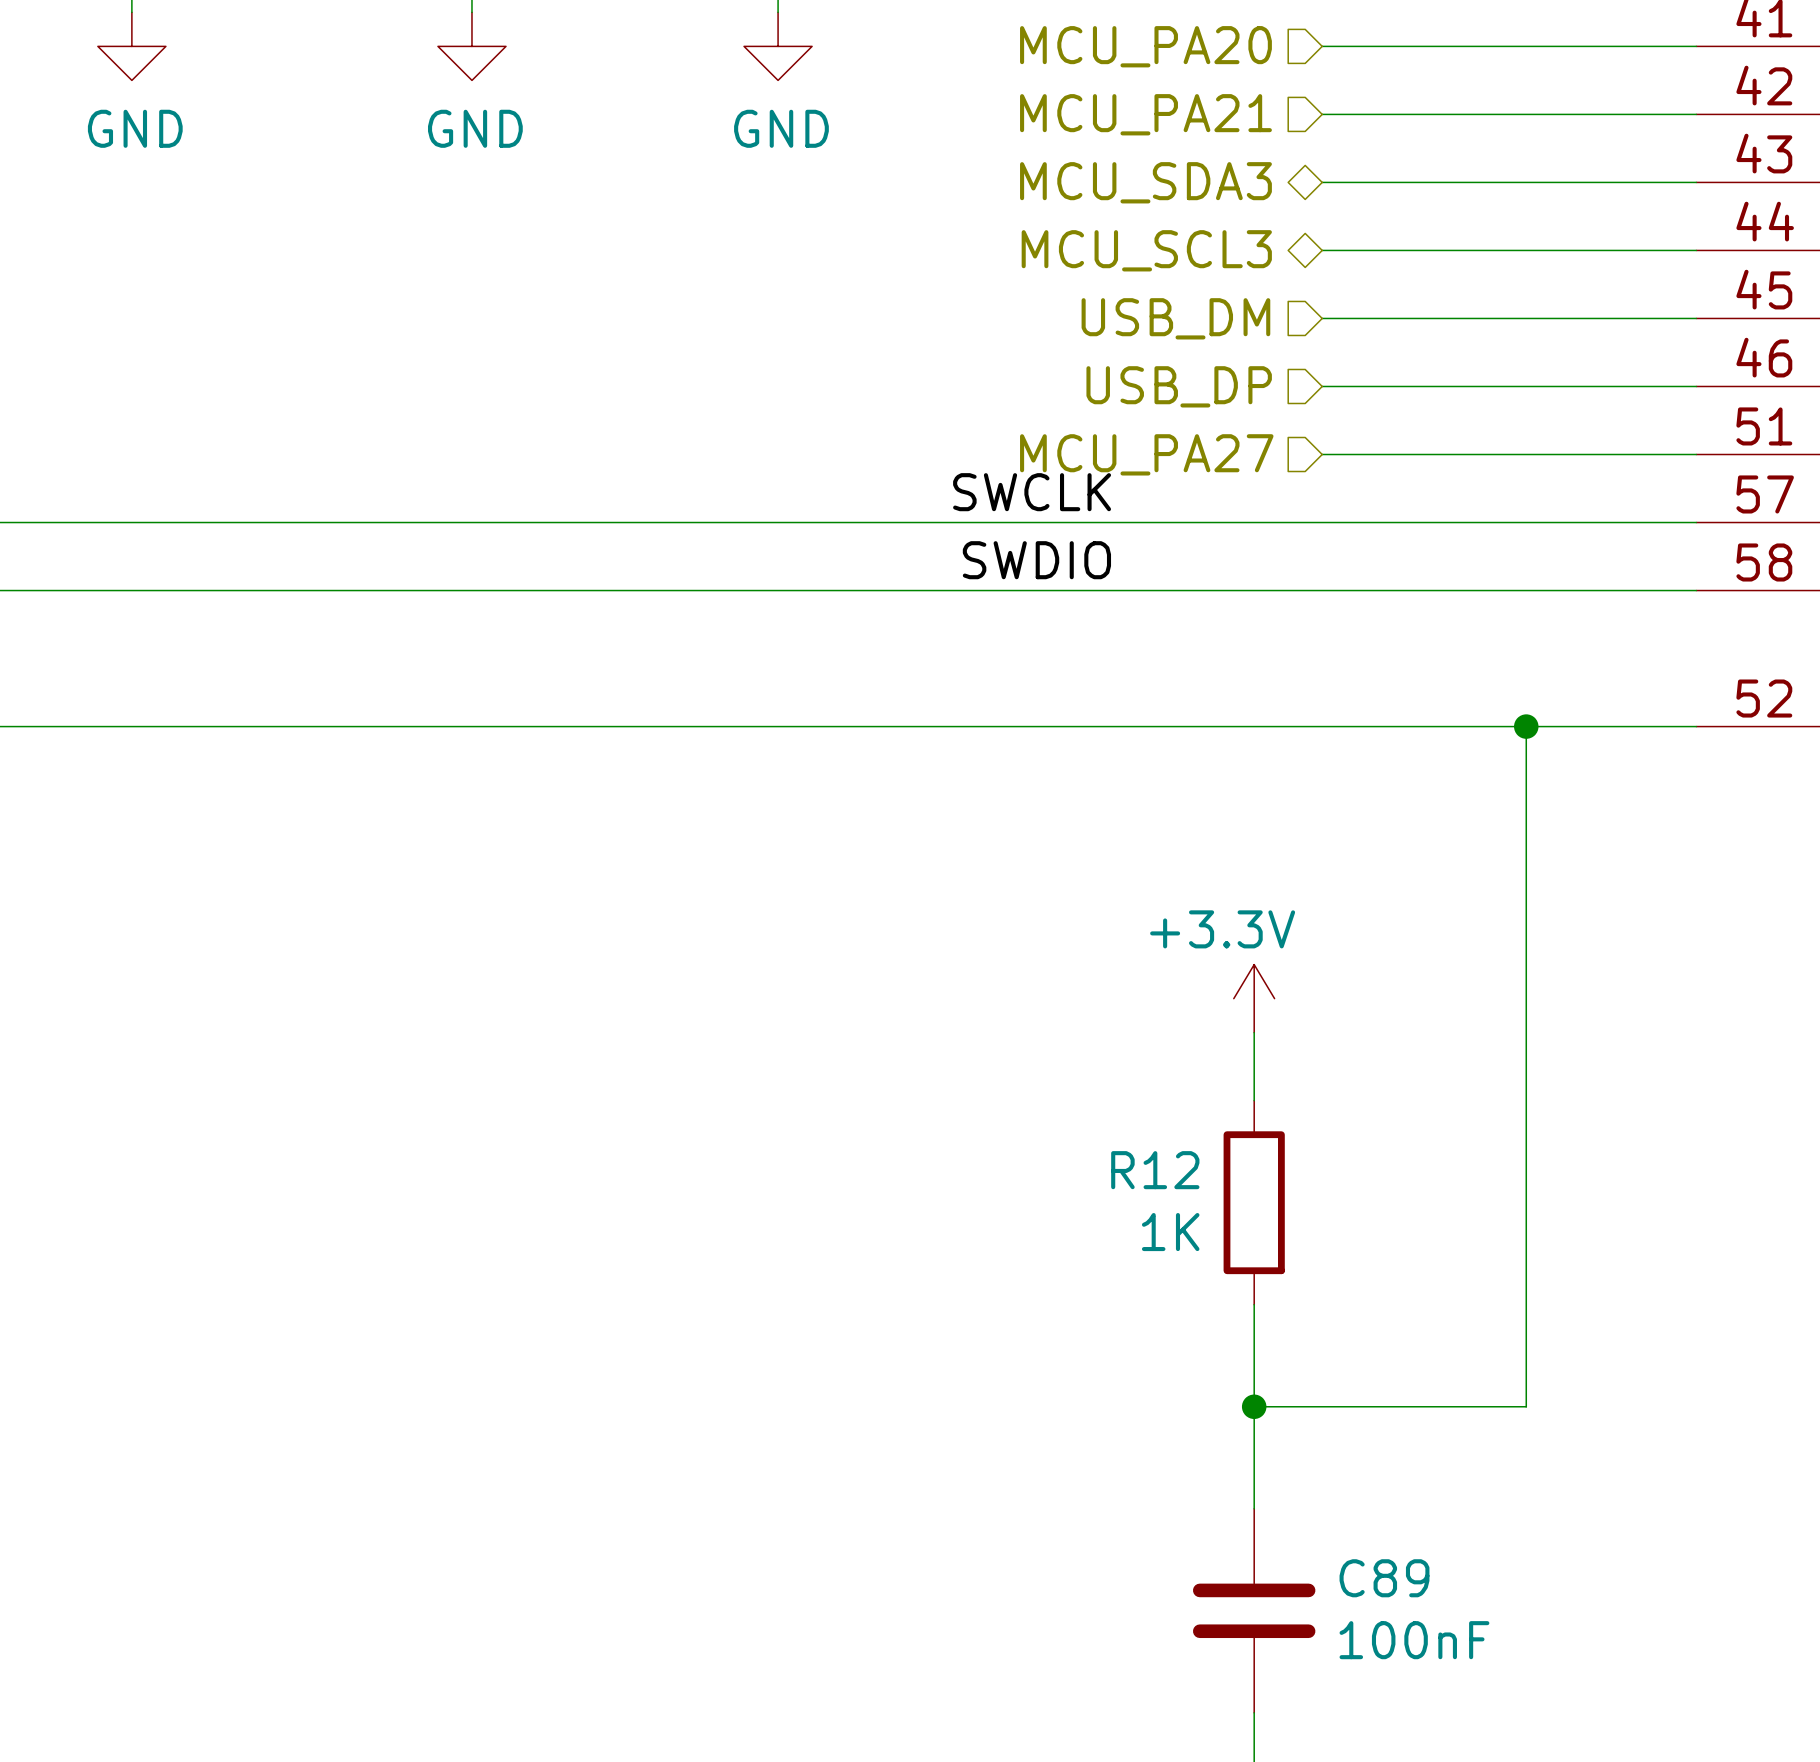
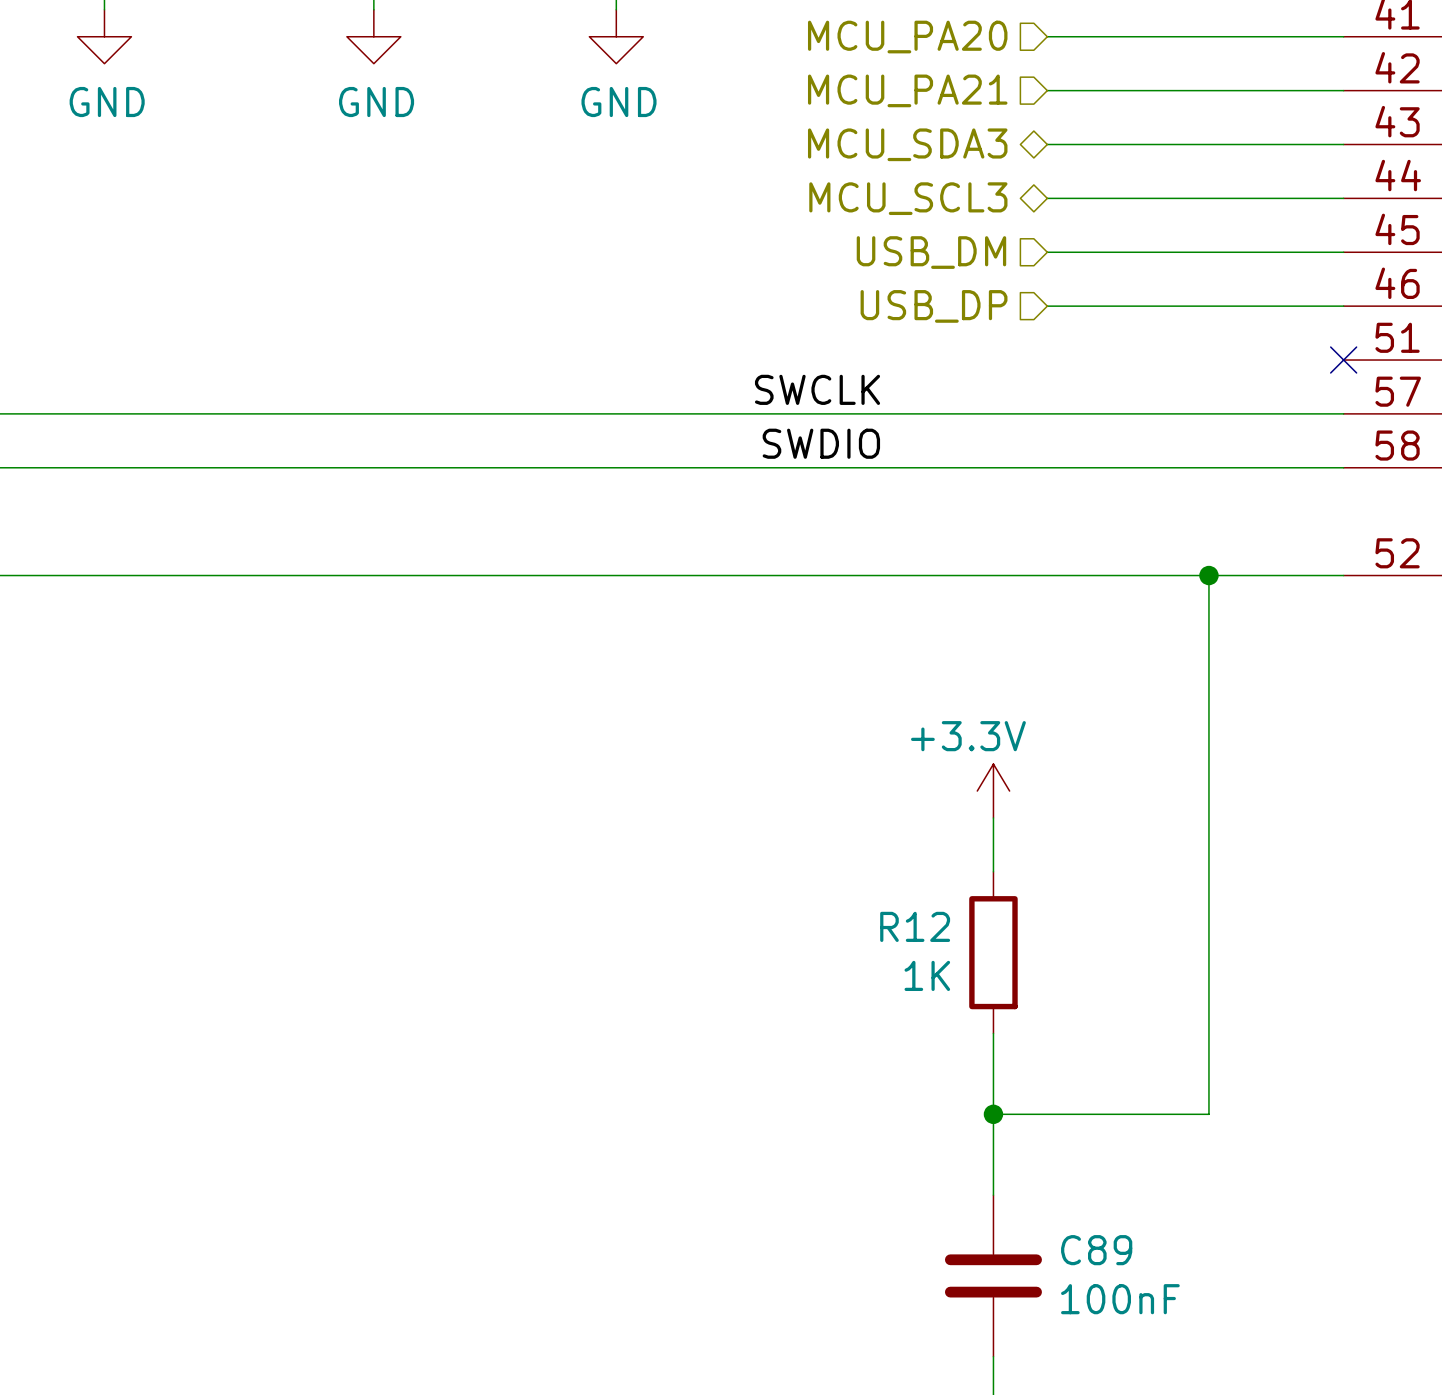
hierarchical label: MCU_PA27 (1146, 454) -> none
wire: (1322, 454) (1696, 454) -> none
no-connect mark: none -> (1343, 360)

